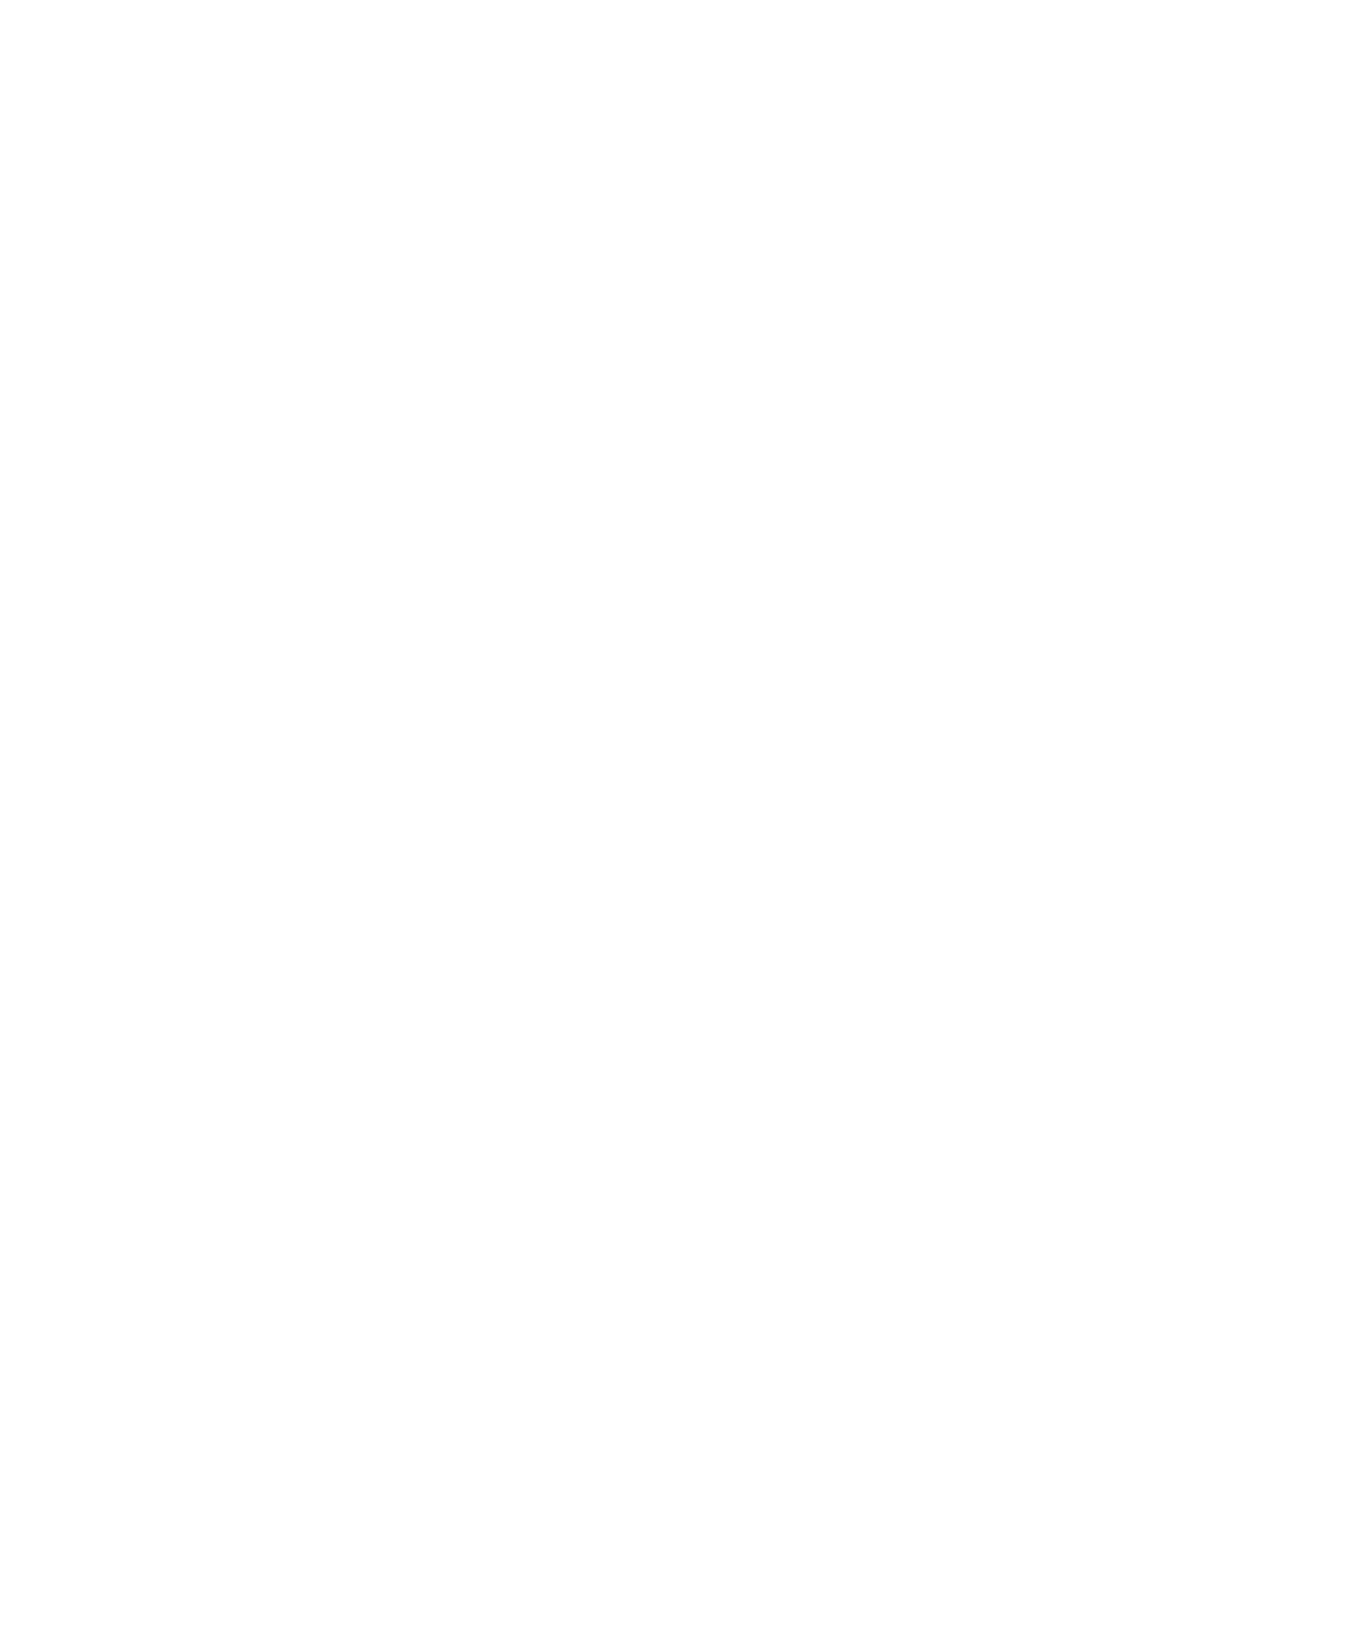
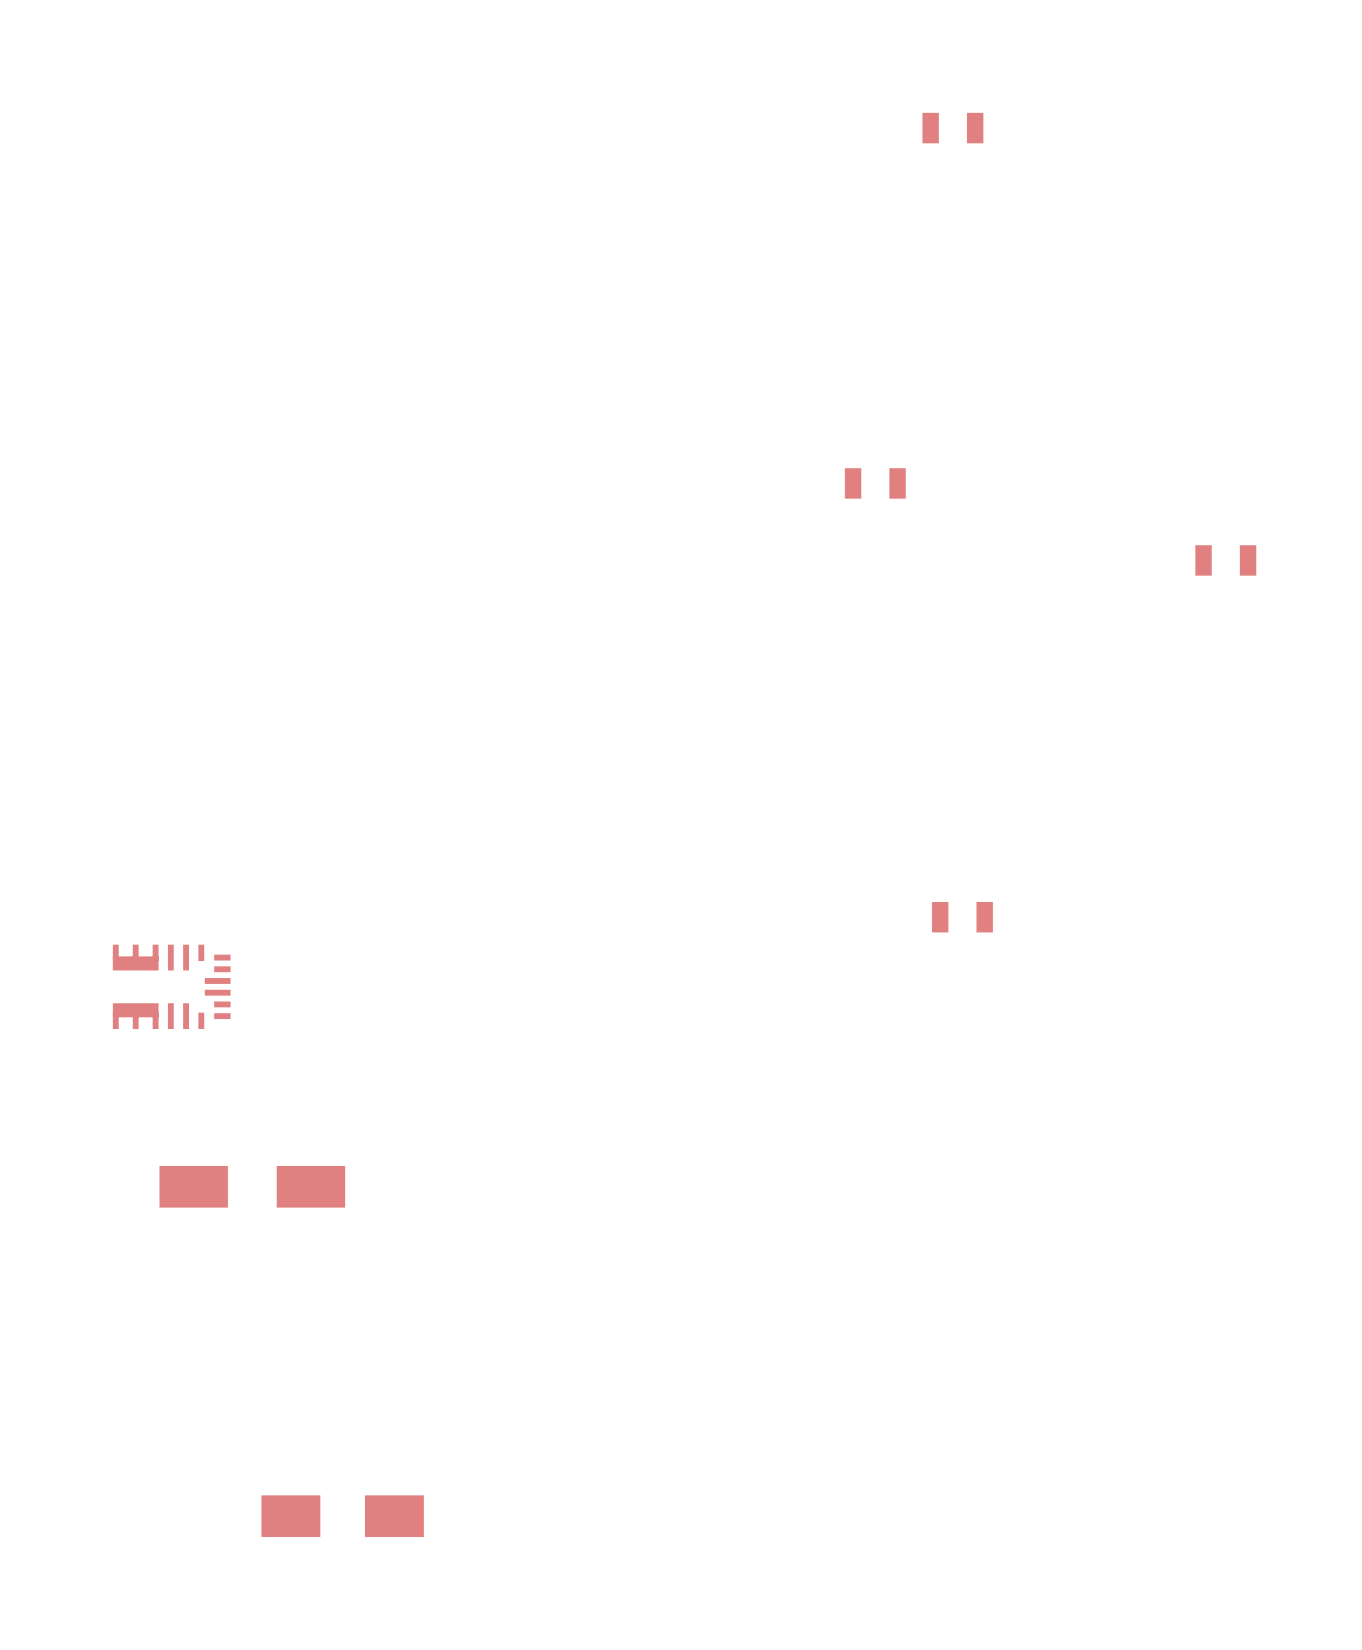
part: none -> (952, 128)
part: none -> (875, 483)
part: none -> (1225, 560)
part: none -> (962, 917)
part: none -> (171, 986)
part: none -> (252, 1186)
part: none -> (342, 1516)

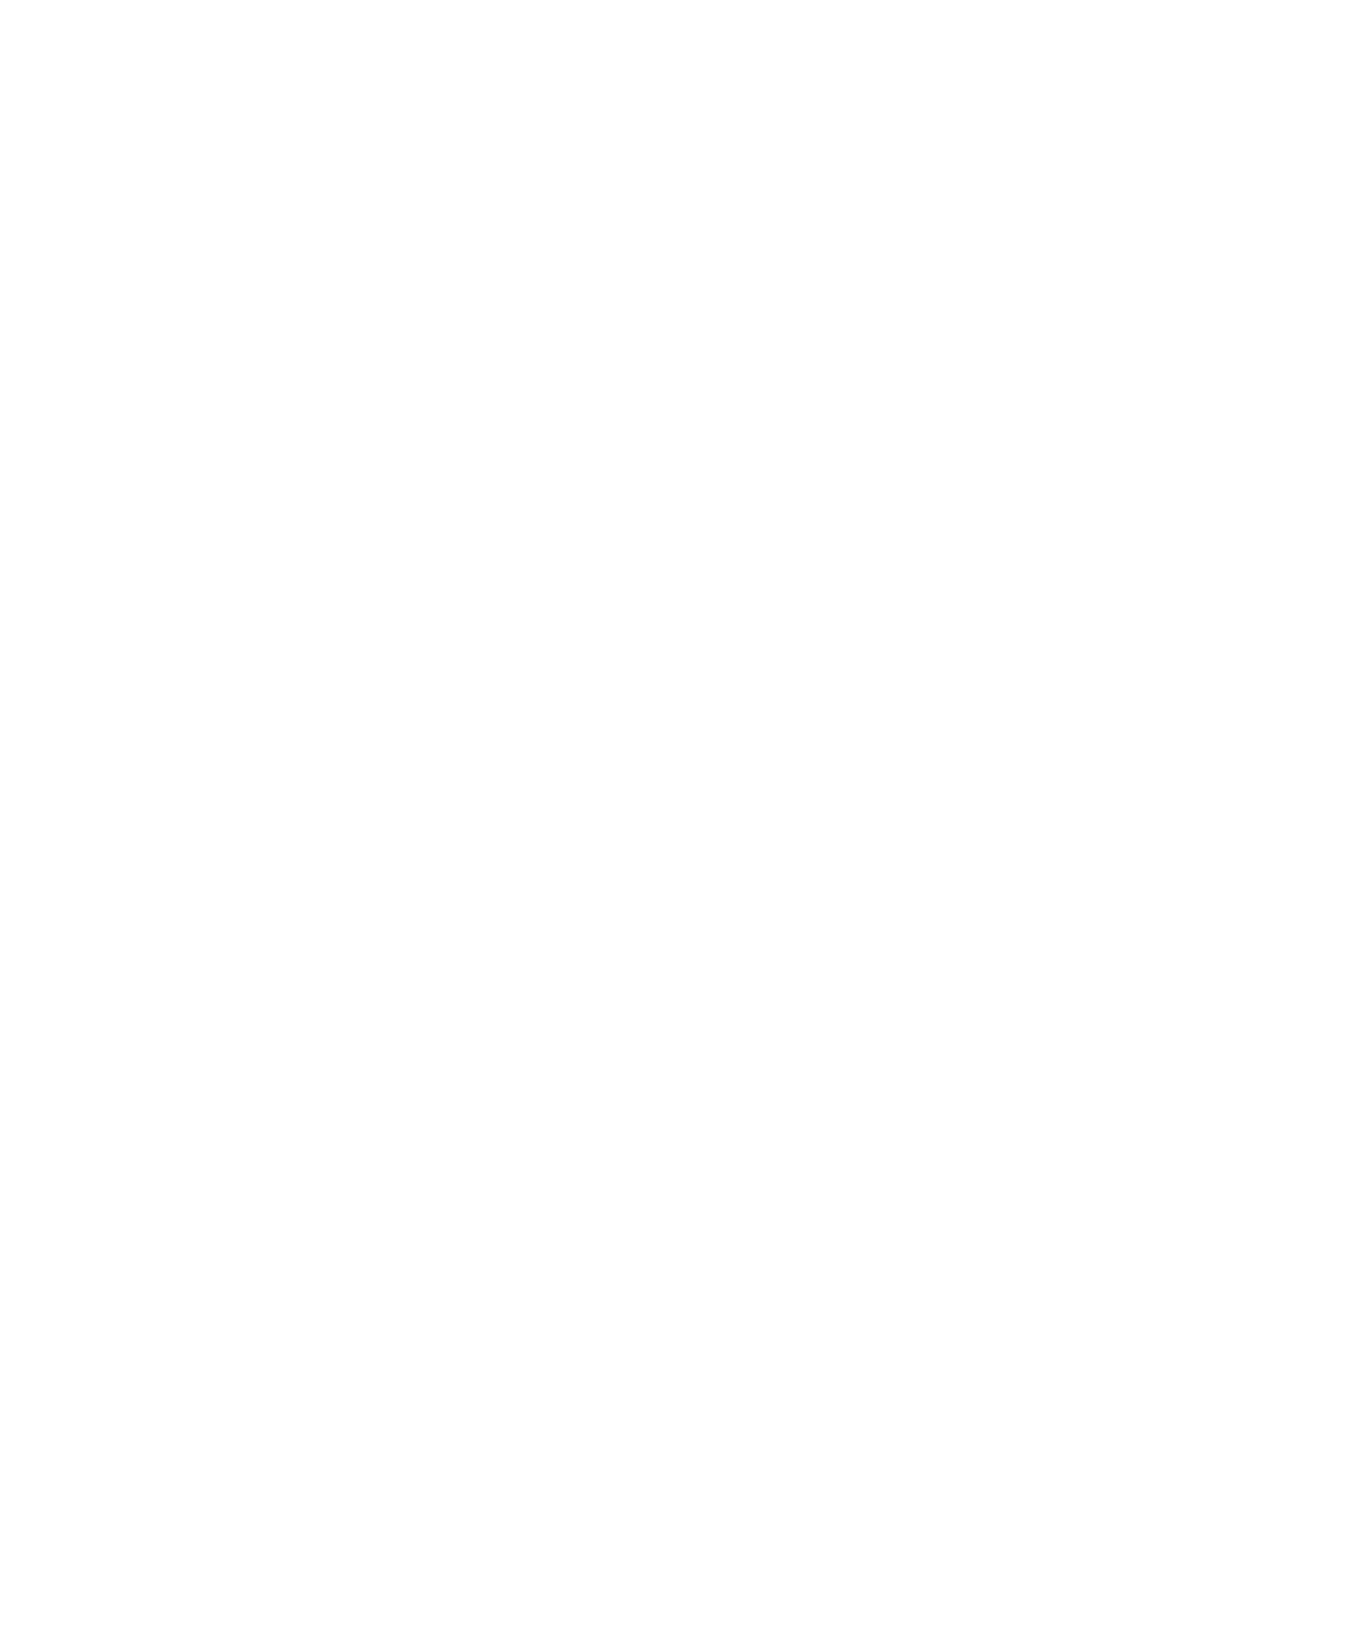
part: (952, 128) -> none
part: (875, 483) -> none
part: (1225, 560) -> none
part: (962, 917) -> none
part: (171, 986) -> none
part: (252, 1186) -> none
part: (342, 1516) -> none

